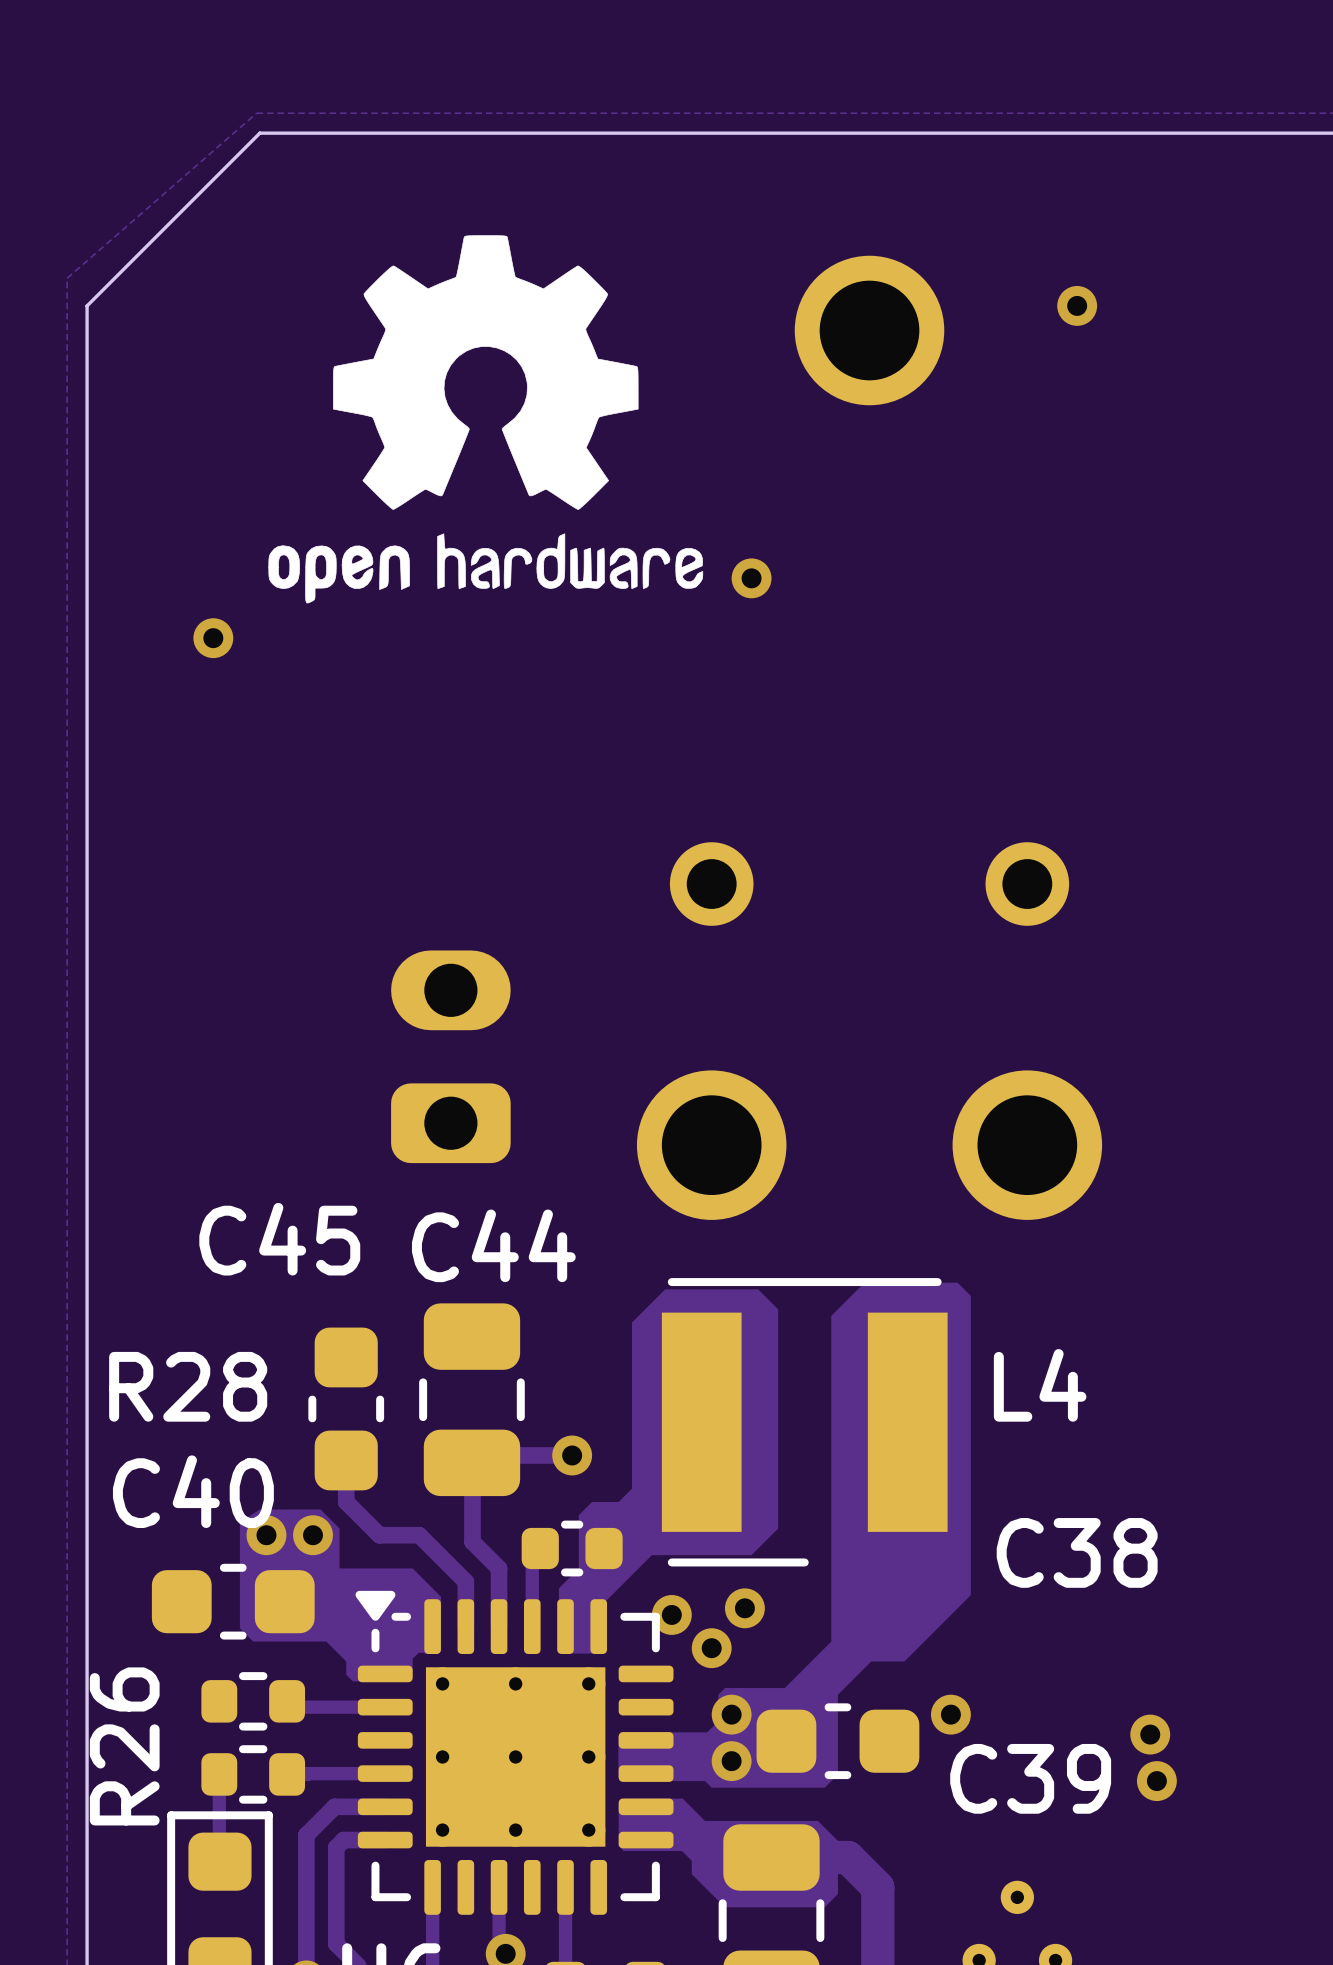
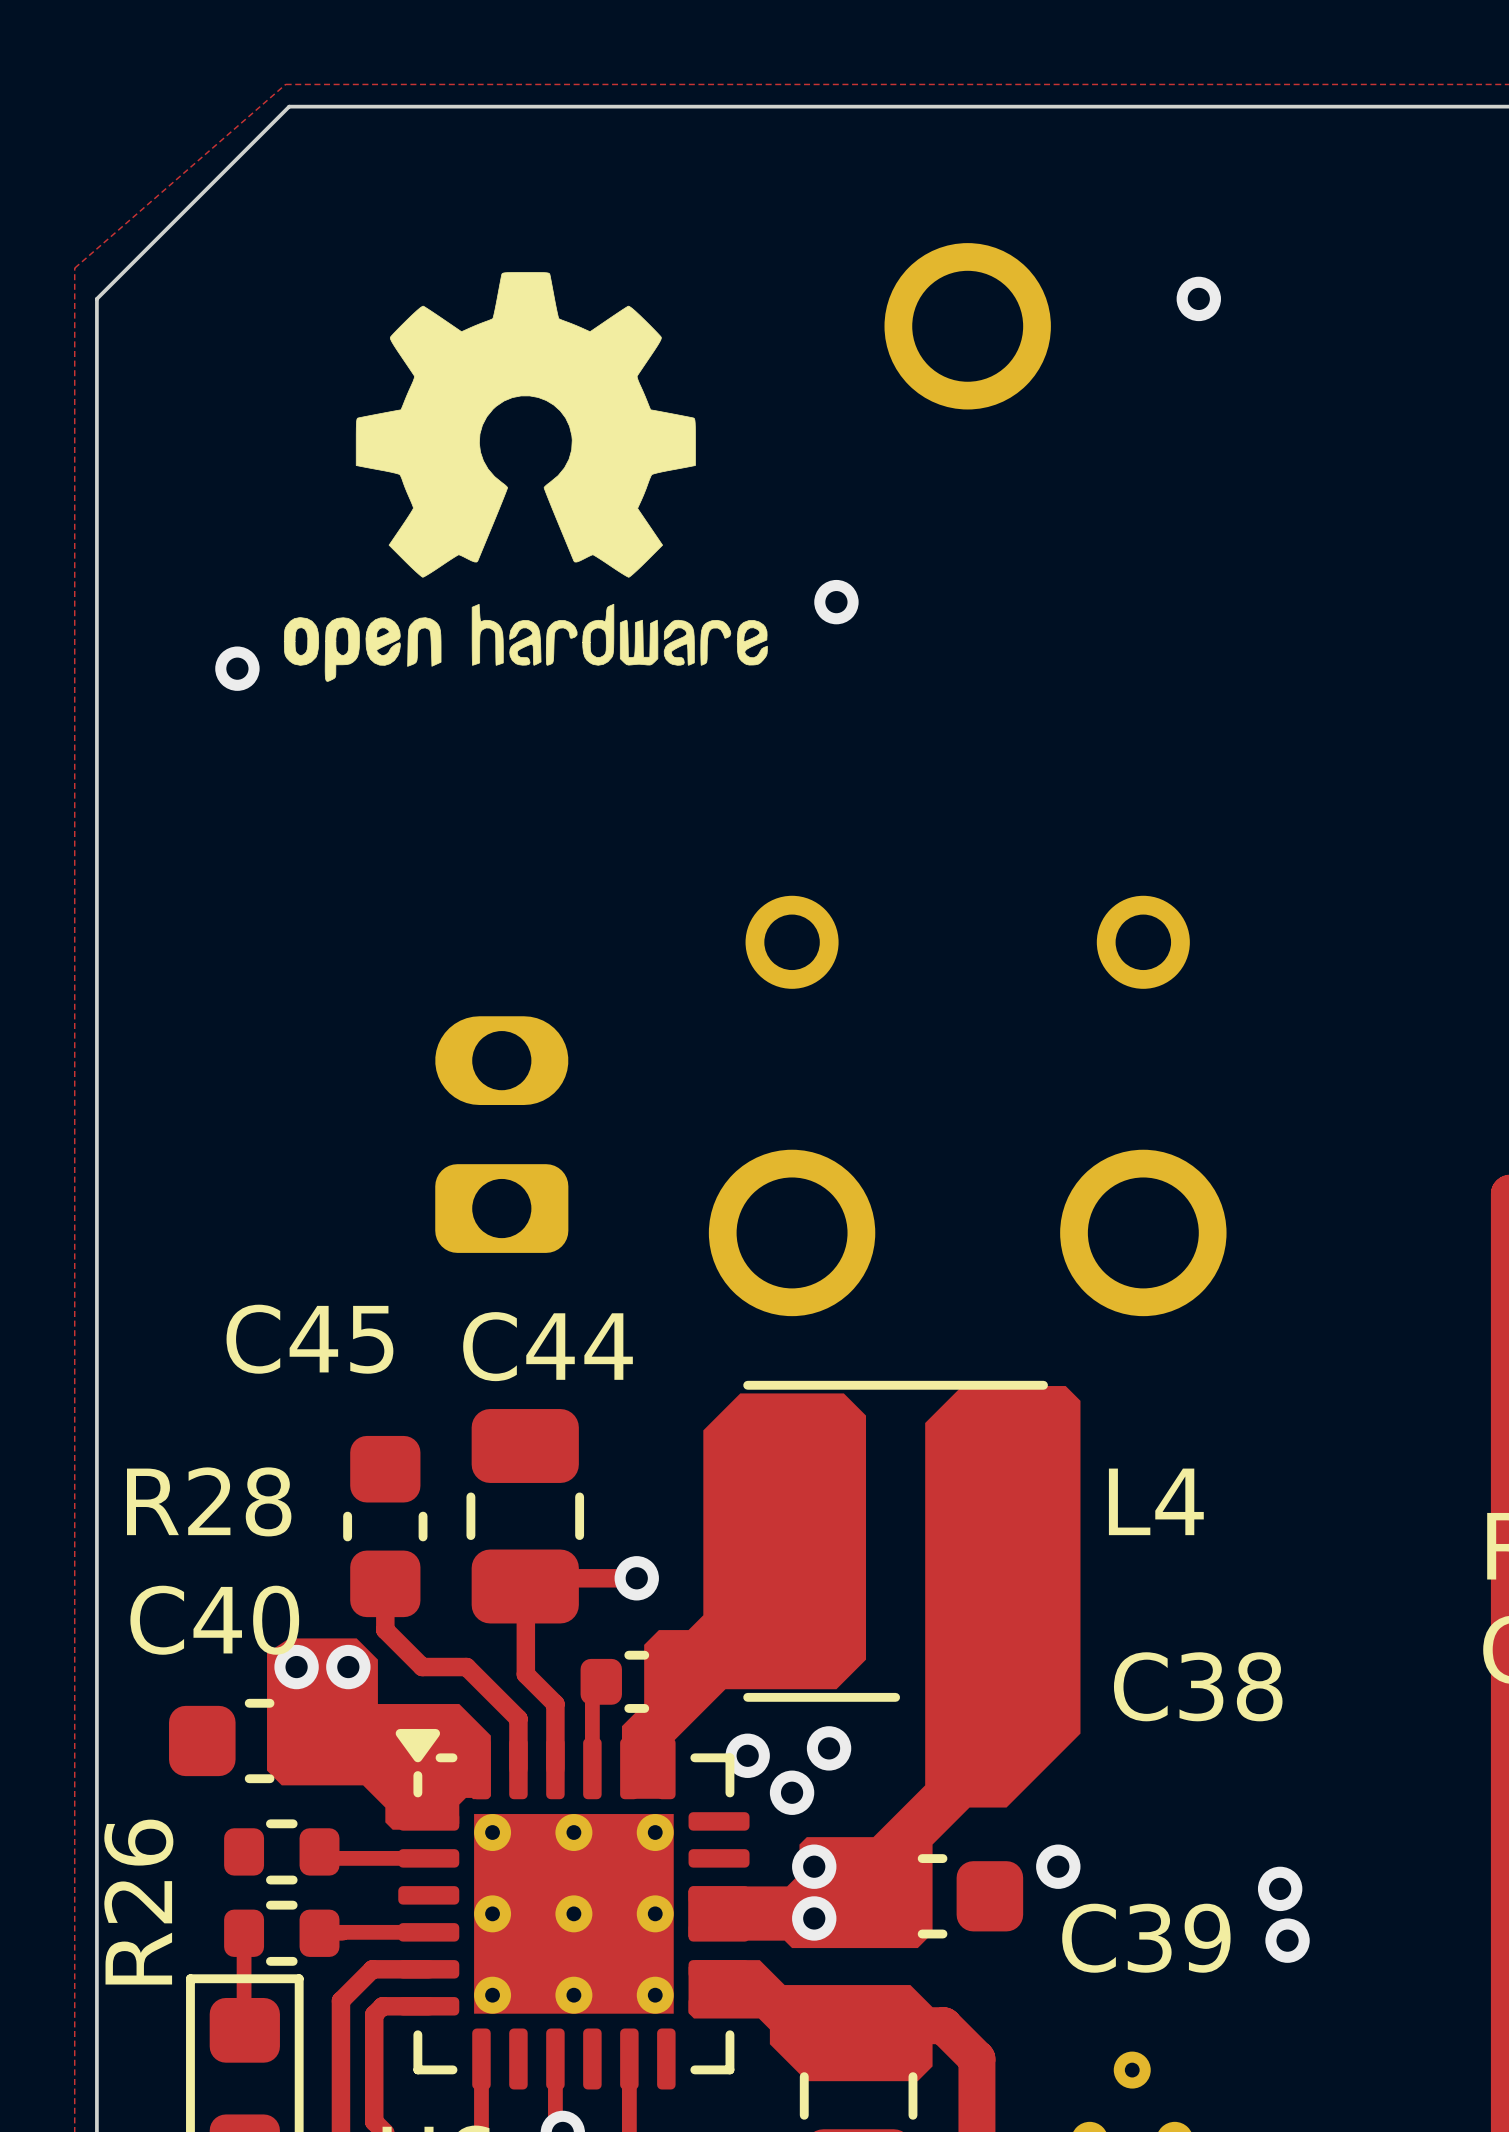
drawing position: (485, 419) -> (525, 476)

